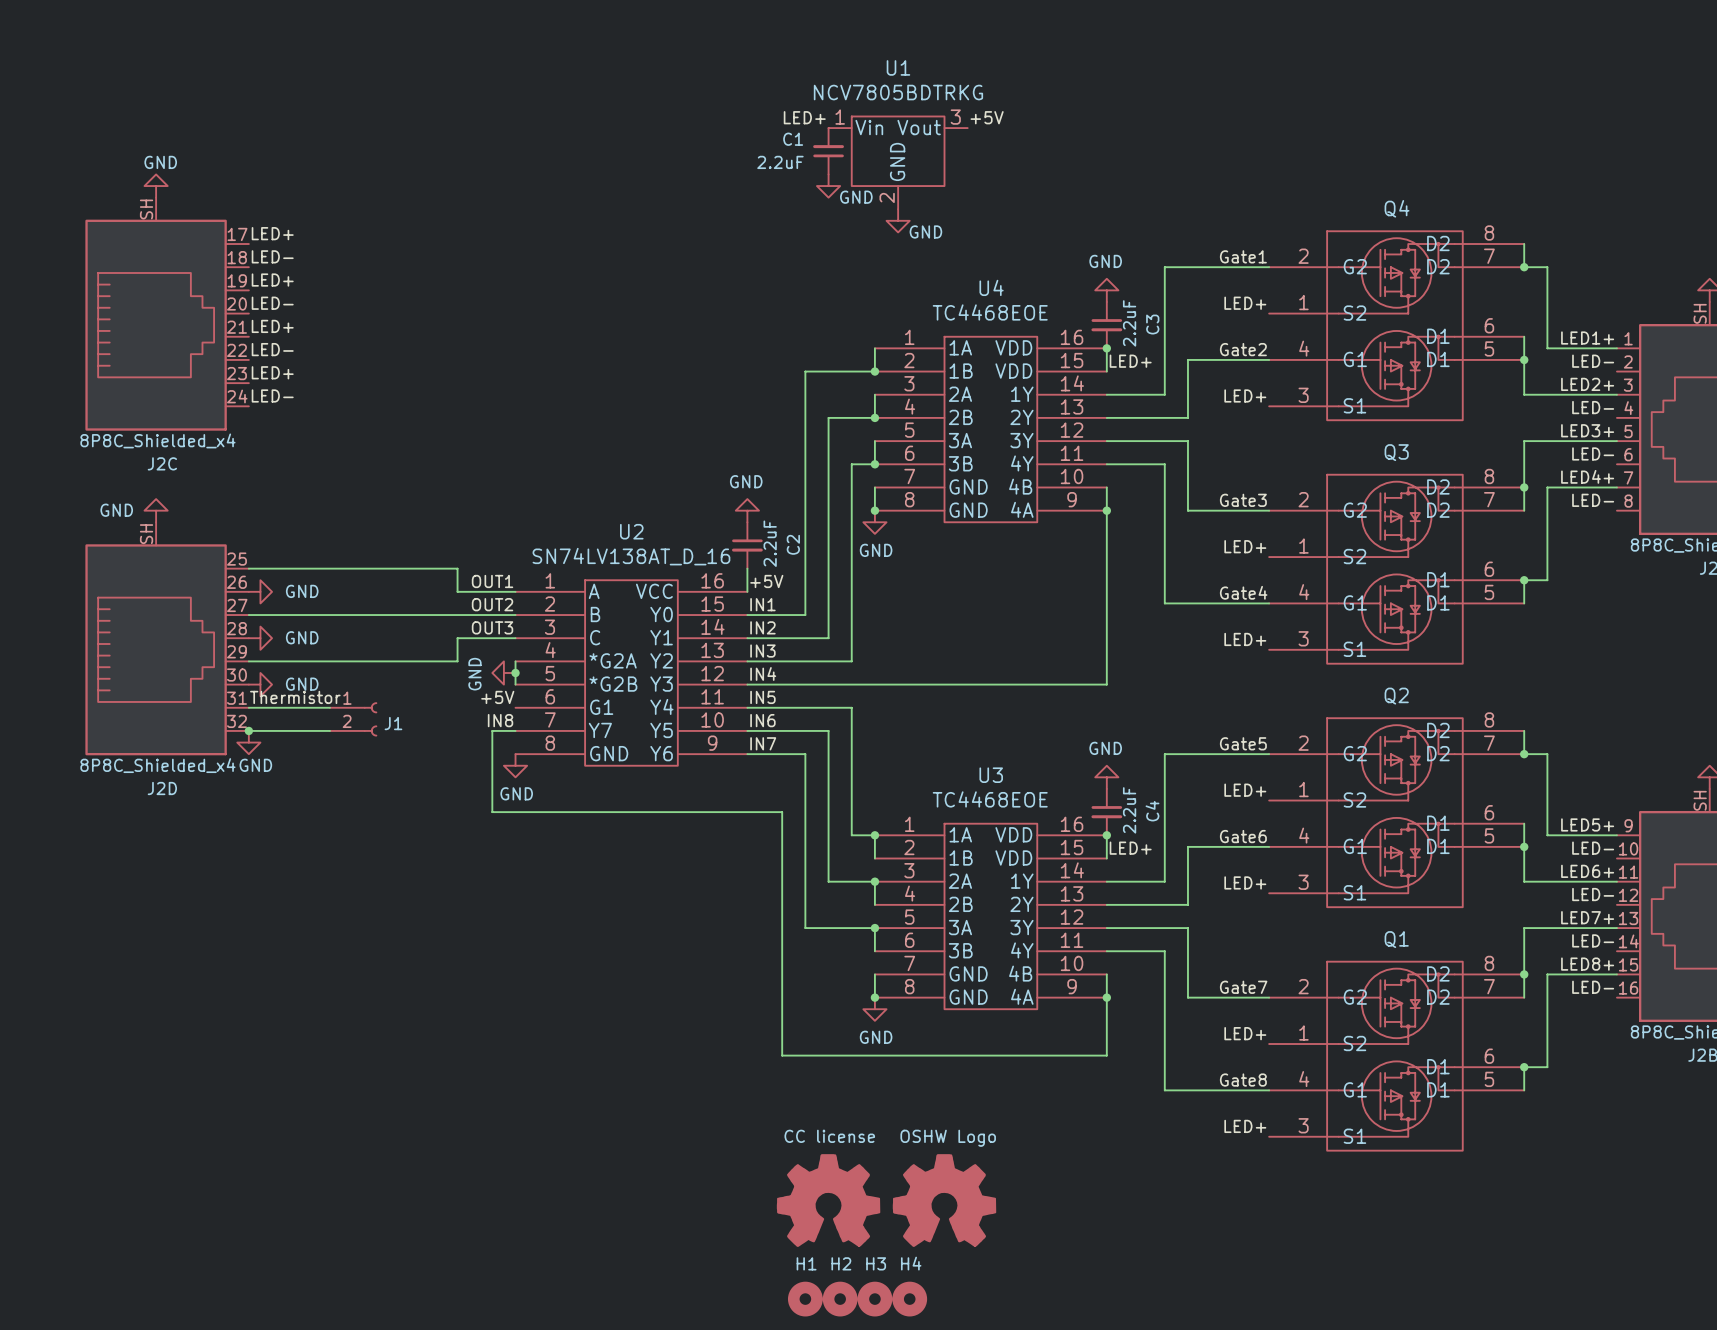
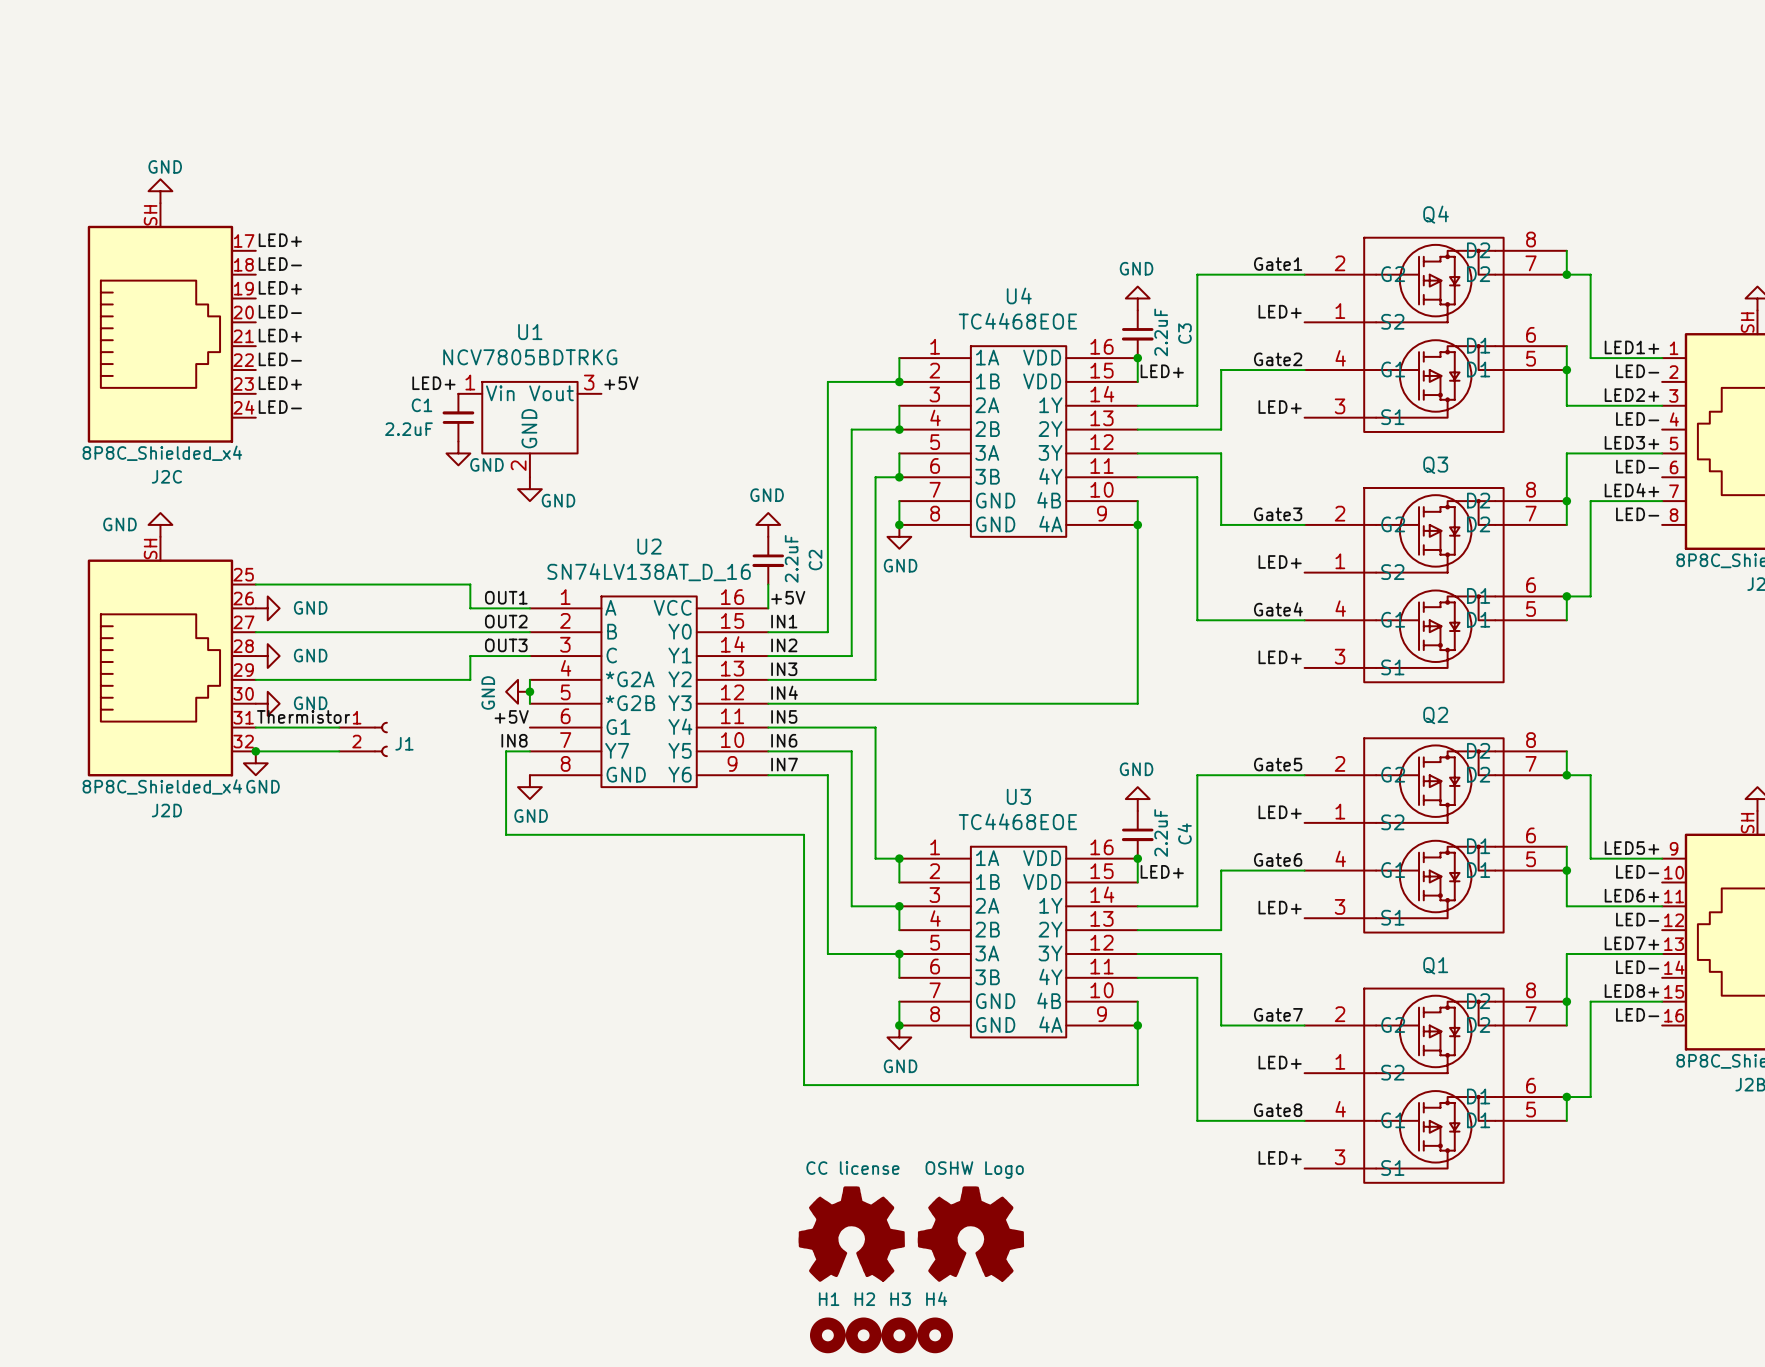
label: LED+ (804, 117) -> none
label: +5V (987, 117) -> none
C1 position: (828, 151) -> (458, 417)
U1 position: (898, 162) -> (529, 429)
power symbol: GND (828, 186) -> none
power symbol: GND (898, 220) -> none
label: none -> LED+ (433, 383)
label: none -> +5V (621, 383)
power symbol: none -> GND (458, 453)
power symbol: none -> GND (529, 489)

